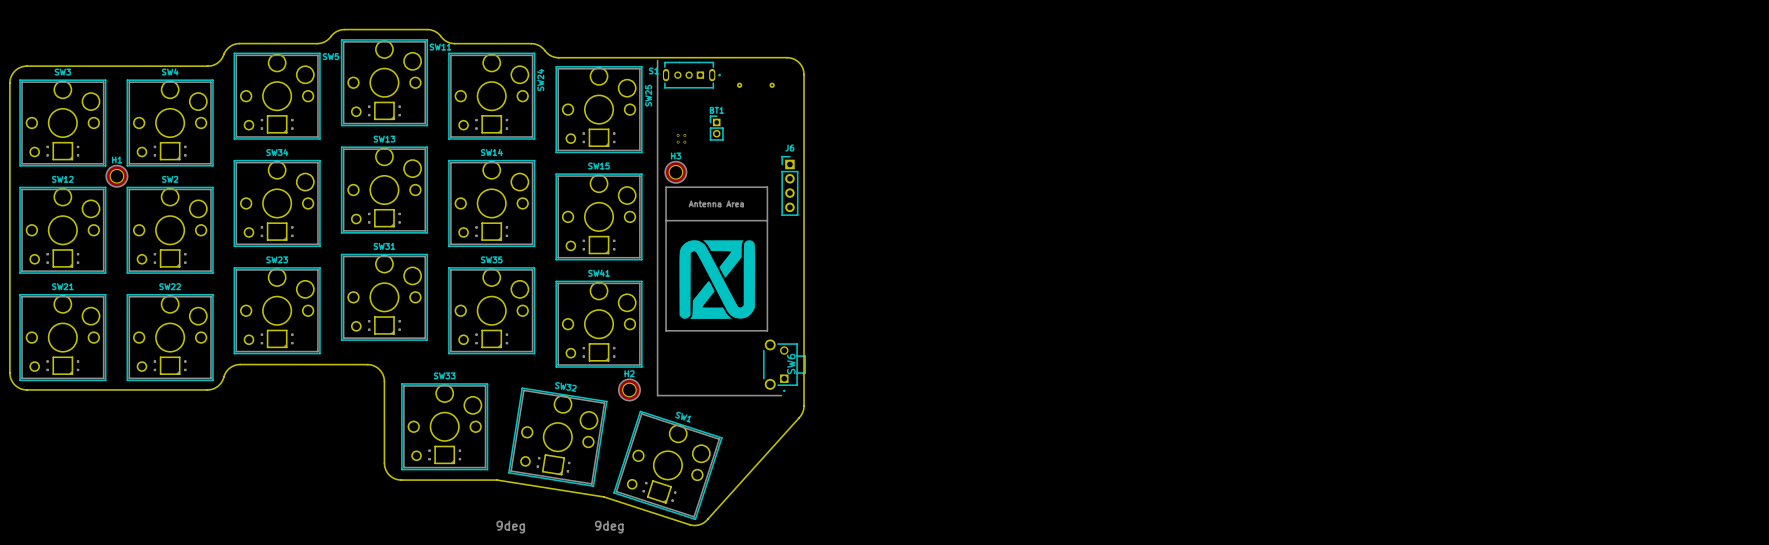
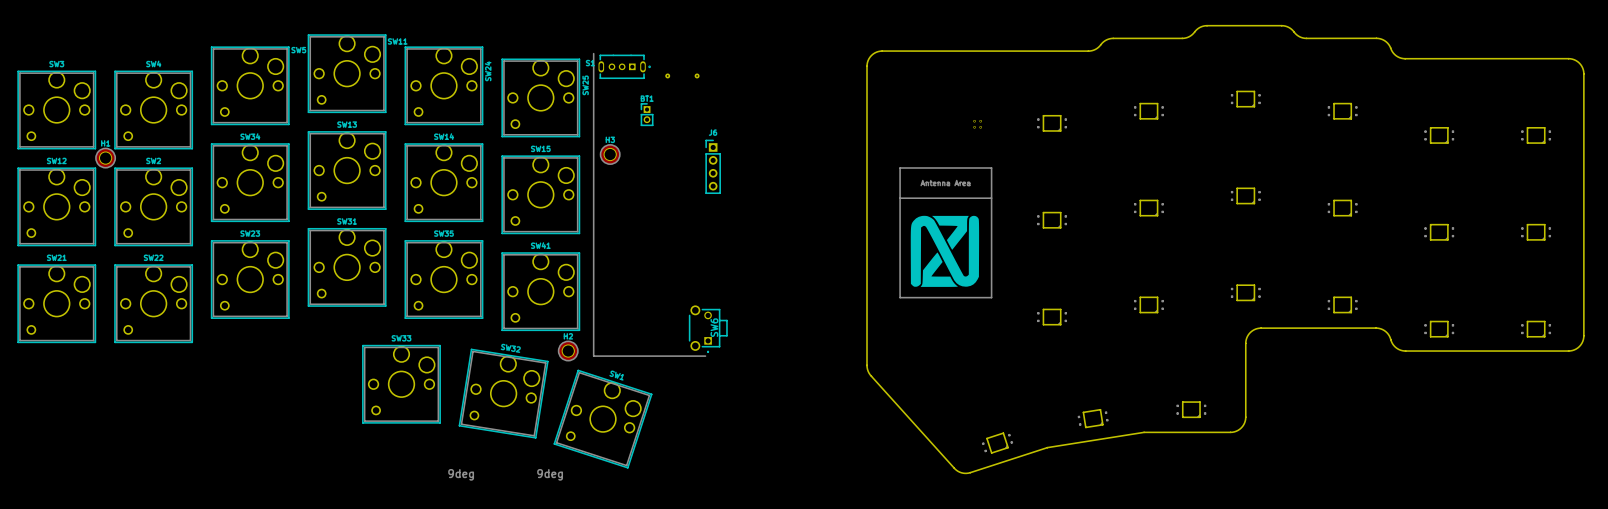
board edge: (344, 29) (429, 29) (452, 43) (535, 44) (549, 54) (556, 57) (787, 57) (795, 59) (800, 64) (804, 74) (803, 410) (799, 417) (704, 522) (691, 525) (604, 496) (497, 480) (394, 478) (387, 473) (384, 465) (383, 377) (379, 369) (371, 365) (238, 364) (228, 369) (217, 386) (207, 389) (26, 389) (18, 387) (13, 383) (9, 373) (9, 83) (14, 71) (26, 66) (210, 66) (219, 61) (227, 49) (235, 44) (319, 43) (326, 40) (336, 31) (344, 29) -> none
board edge: none -> (1207, 25) (1283, 25) (1304, 38) (1378, 38) (1386, 42) (1394, 54) (1403, 58) (1568, 58) (1577, 61) (1581, 66) (1583, 73) (1583, 335) (1581, 343) (1576, 348) (1568, 351) (1405, 351) (1396, 347) (1386, 332) (1377, 328) (1257, 328) (1250, 332) (1246, 340) (1245, 419) (1242, 426) (1236, 431) (1144, 432) (1047, 447) (970, 472) (958, 471) (871, 376) (867, 369) (867, 66) (869, 58) (874, 53) (882, 51) (1090, 51) (1109, 38) (1184, 38) (1190, 35) (1200, 27) (1207, 25)
part: (384, 110) -> none
part: none -> (1245, 99)
part: (277, 124) -> none
part: (491, 124) -> none
part: none -> (1148, 111)
part: none -> (1342, 111)
part: (599, 137) -> none
part: none -> (1052, 123)
part: (681, 138) -> none
part: none -> (977, 124)
part: (62, 151) -> none
part: (170, 151) -> none
part: none -> (1439, 135)
part: none -> (1536, 135)
part: (384, 218) -> none
part: none -> (1245, 195)
part: (277, 231) -> none
part: (491, 231) -> none
part: none -> (1148, 208)
part: none -> (1342, 208)
drawing: [679, 240, 756, 319] -> none
drawing: none -> [910, 215, 980, 287]
part: (599, 245) -> none
part: none -> (1052, 220)
part: (62, 258) -> none
part: (170, 258) -> none
part: none -> (1439, 232)
part: none -> (1536, 232)
part: (716, 259) -> none
part: none -> (945, 232)
part: (384, 325) -> none
part: none -> (1245, 292)
part: (277, 338) -> none
part: (491, 338) -> none
part: none -> (1148, 304)
part: none -> (1342, 304)
part: (599, 352) -> none
part: none -> (1052, 317)
part: (62, 365) -> none
part: (170, 365) -> none
part: none -> (1439, 329)
part: none -> (1536, 329)
part: (444, 454) -> none
part: none -> (1191, 409)
part: (553, 464) -> none
part: none -> (1093, 418)
part: (659, 491) -> none
part: none -> (997, 443)

